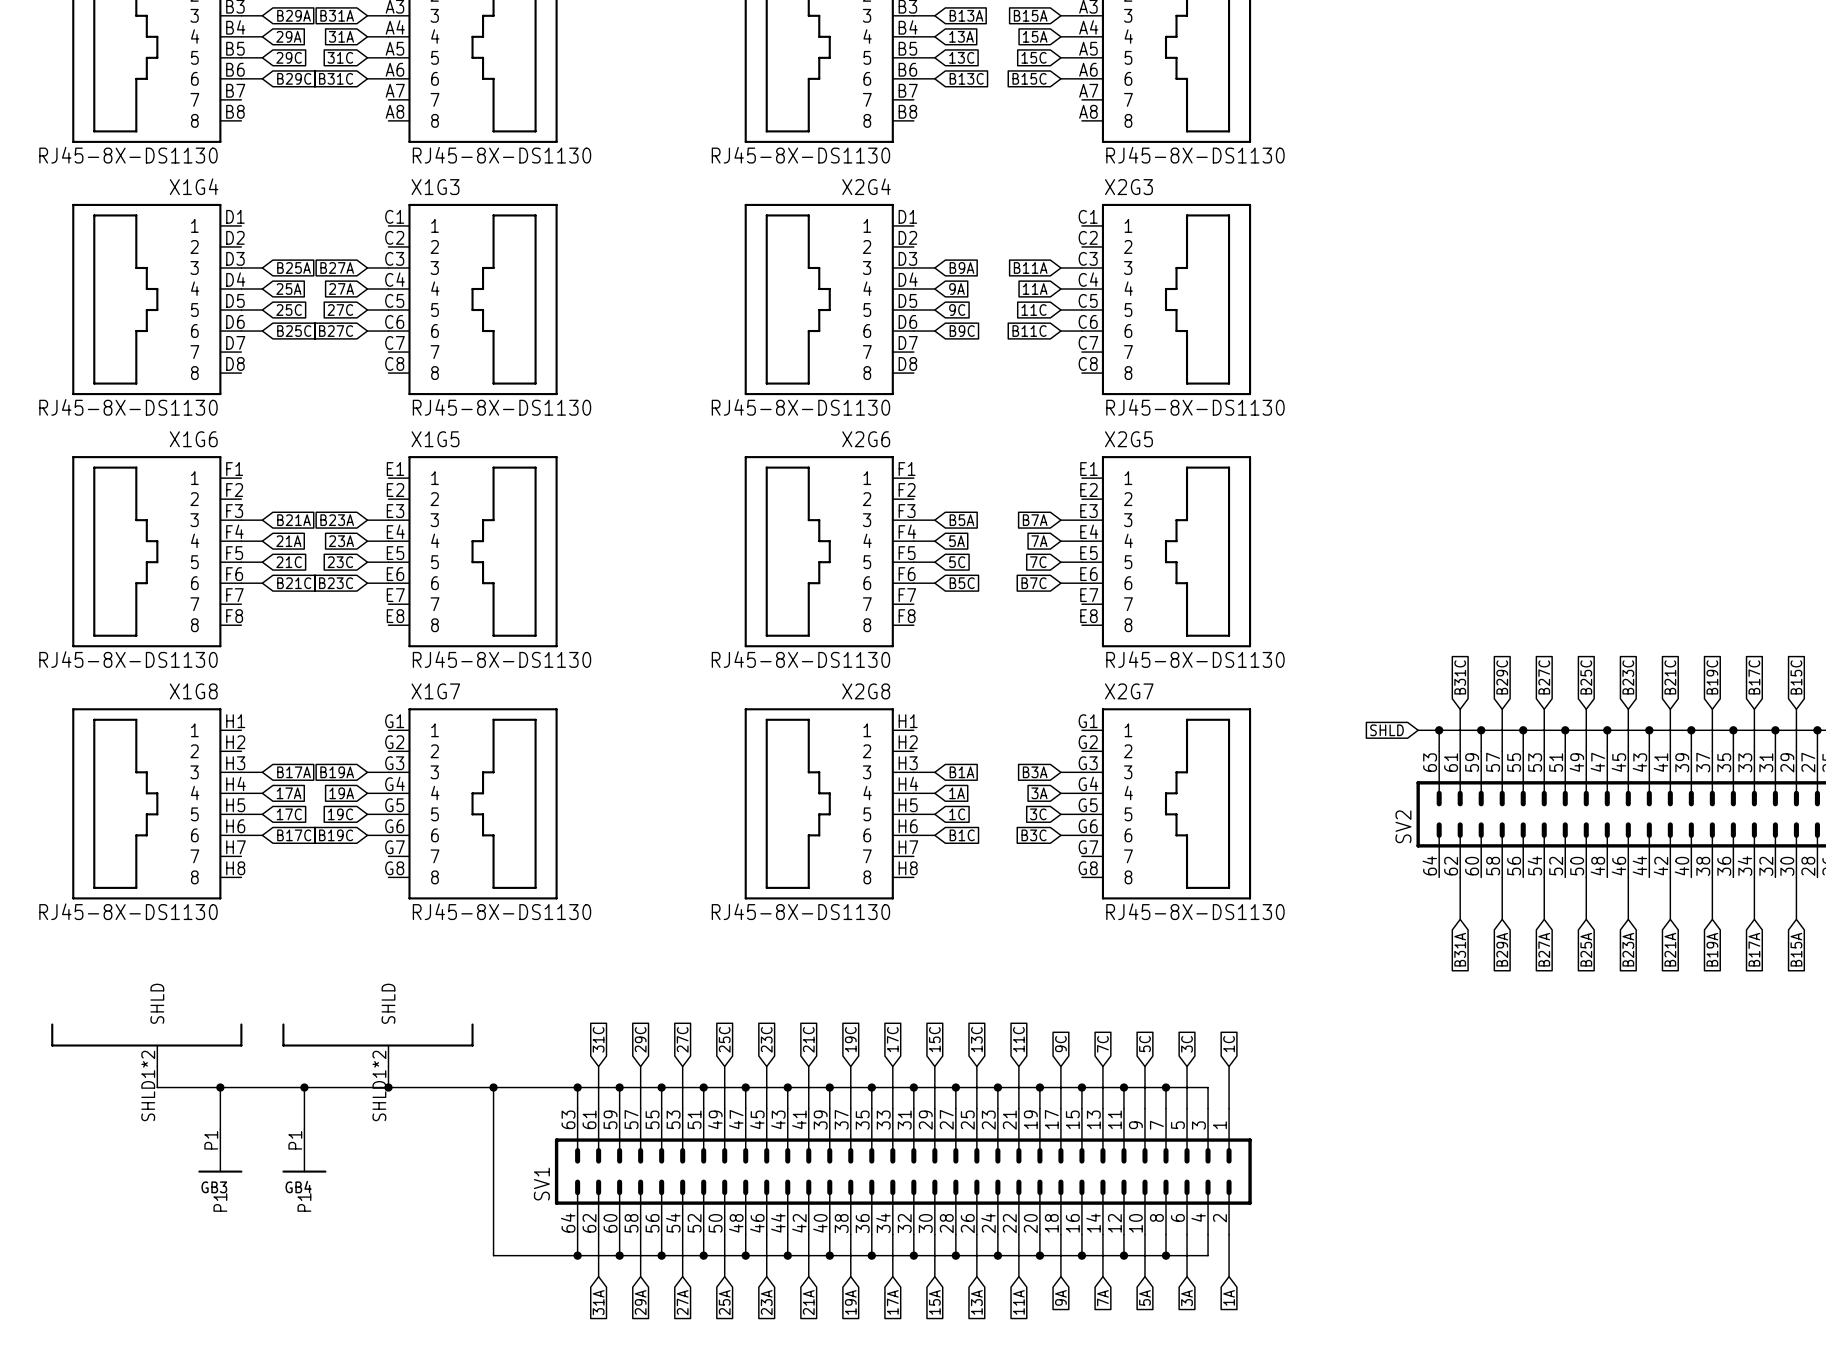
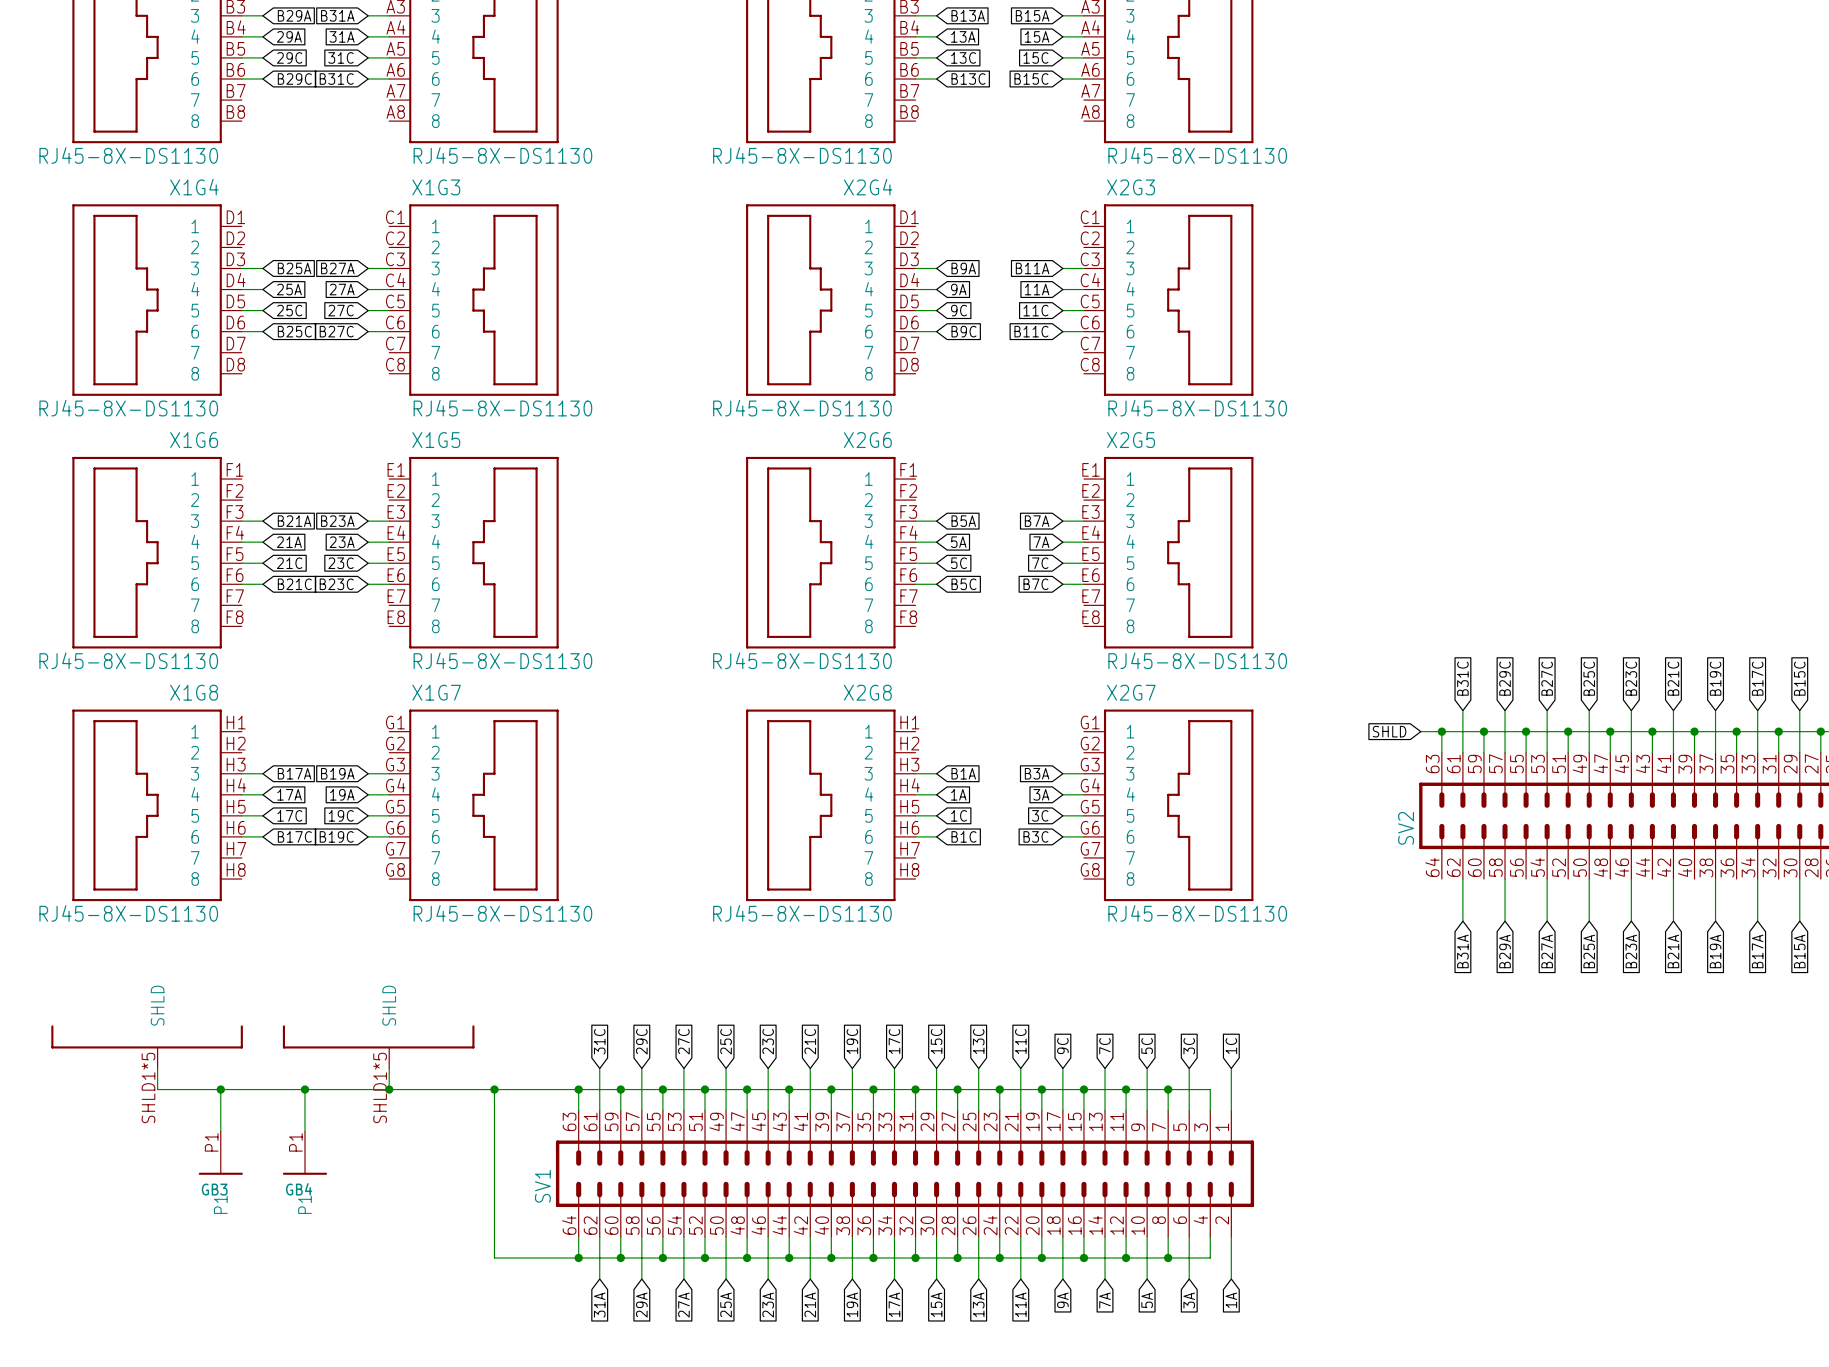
part pin number: SHLD1*2 (148, 1085) -> SHLD1*5 (148, 1087)
part pin number: SHLD1*2 (379, 1085) -> SHLD1*5 (380, 1087)

